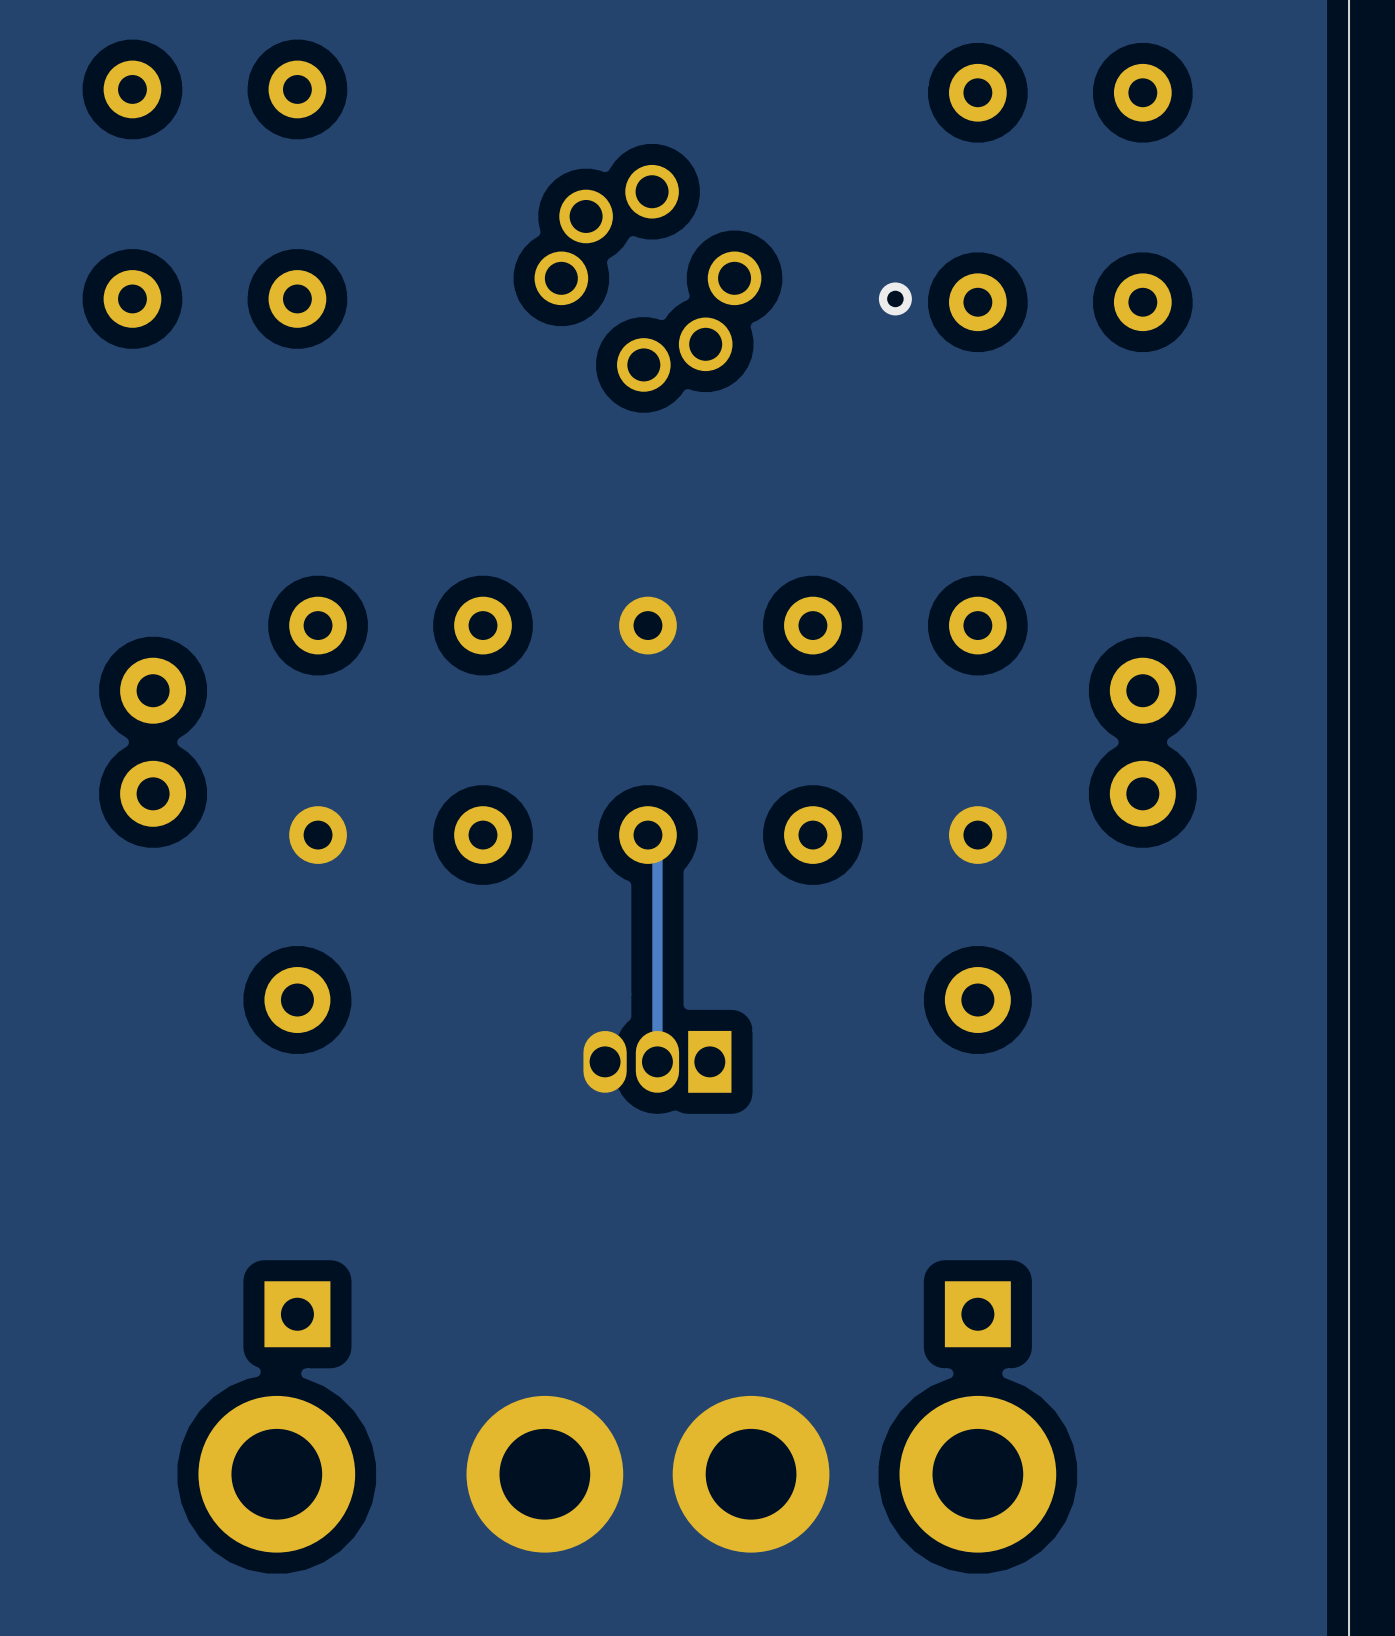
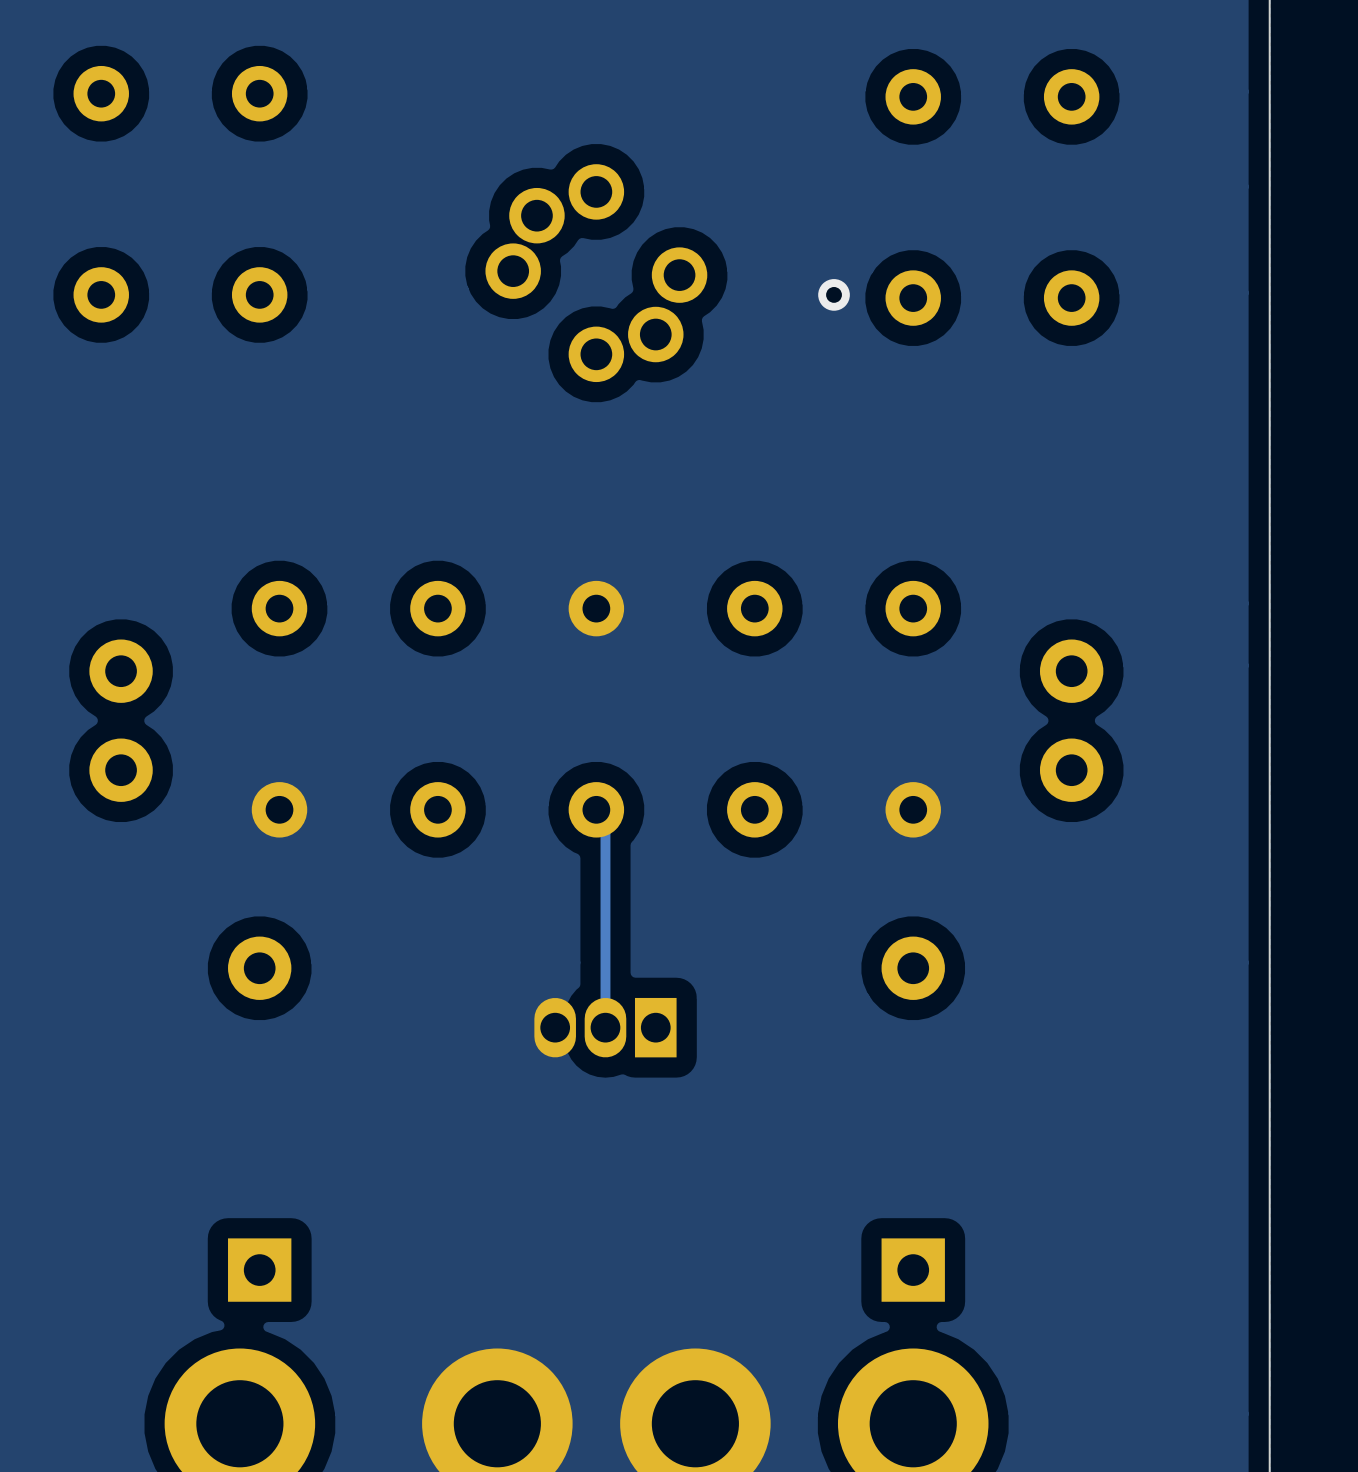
part footprint: [534, 164, 762, 392] -> [485, 164, 708, 383]

